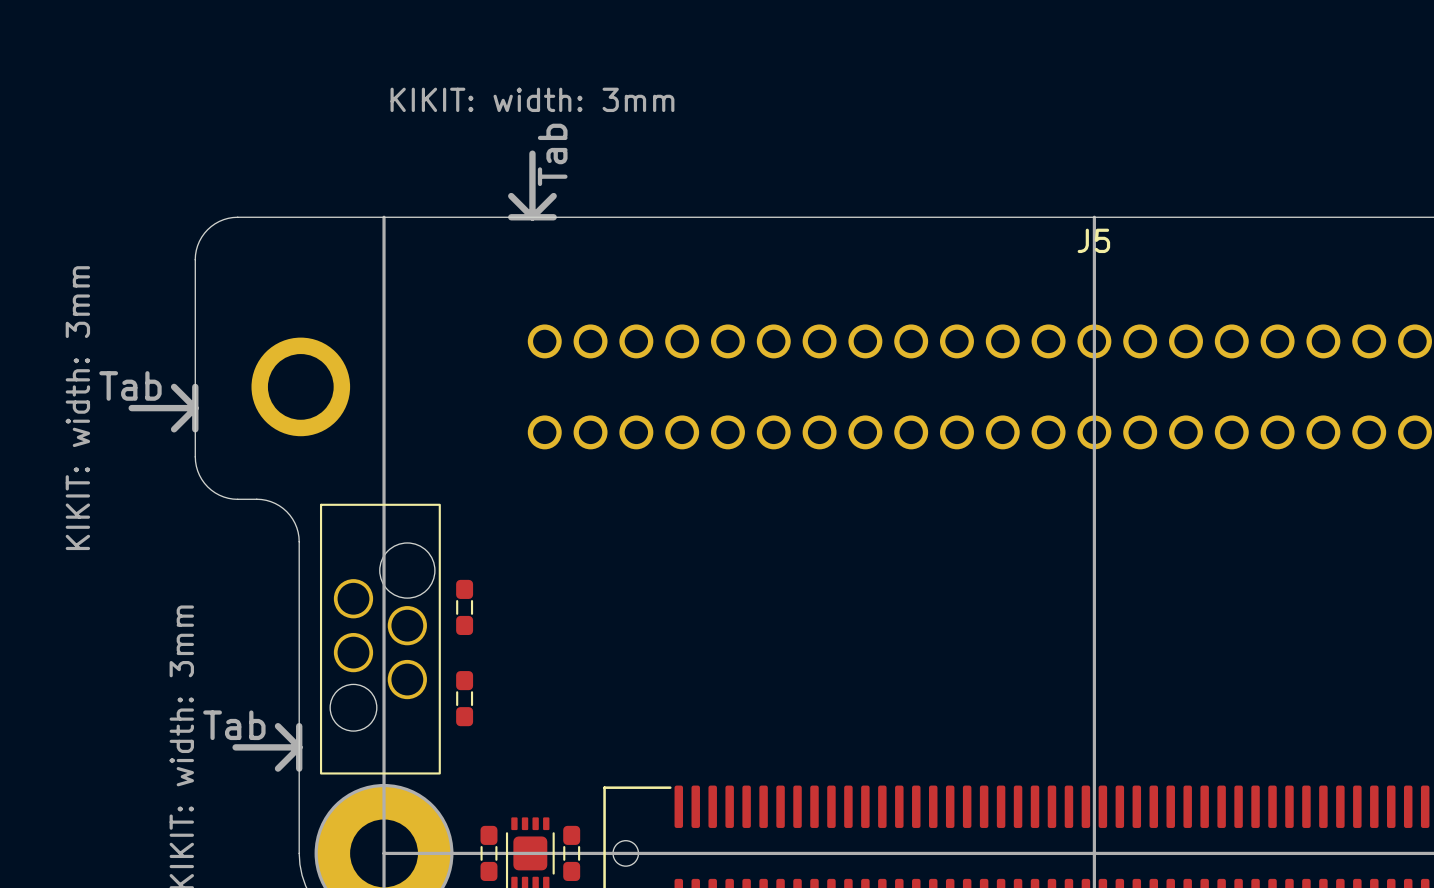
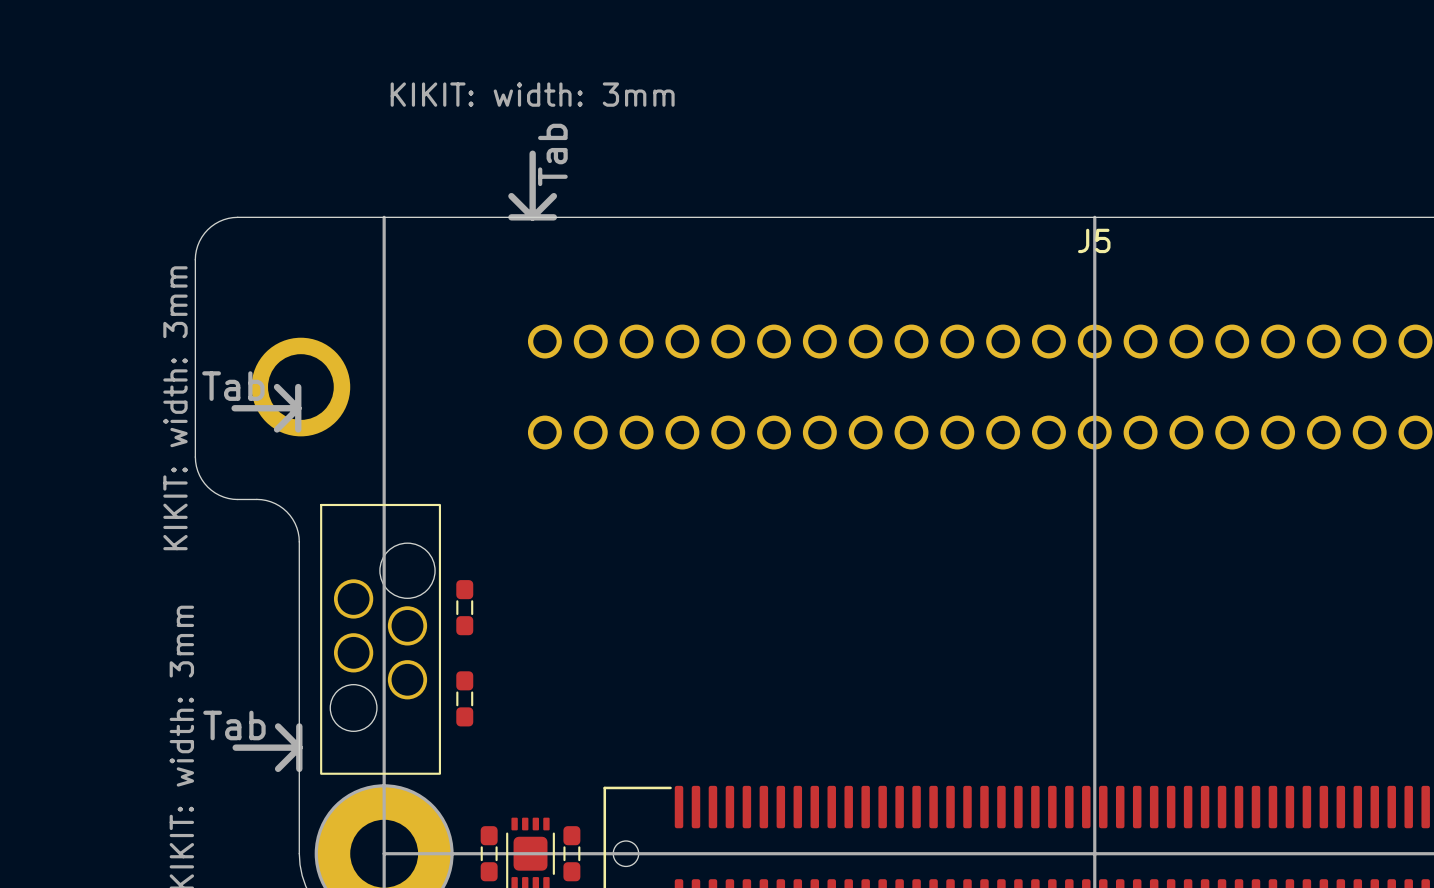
drawing shape: [390, 87, 675, 221] -> [390, 82, 675, 221]
drawing: [128, 383, 199, 433] -> none
drawing: none -> [231, 383, 302, 433]

